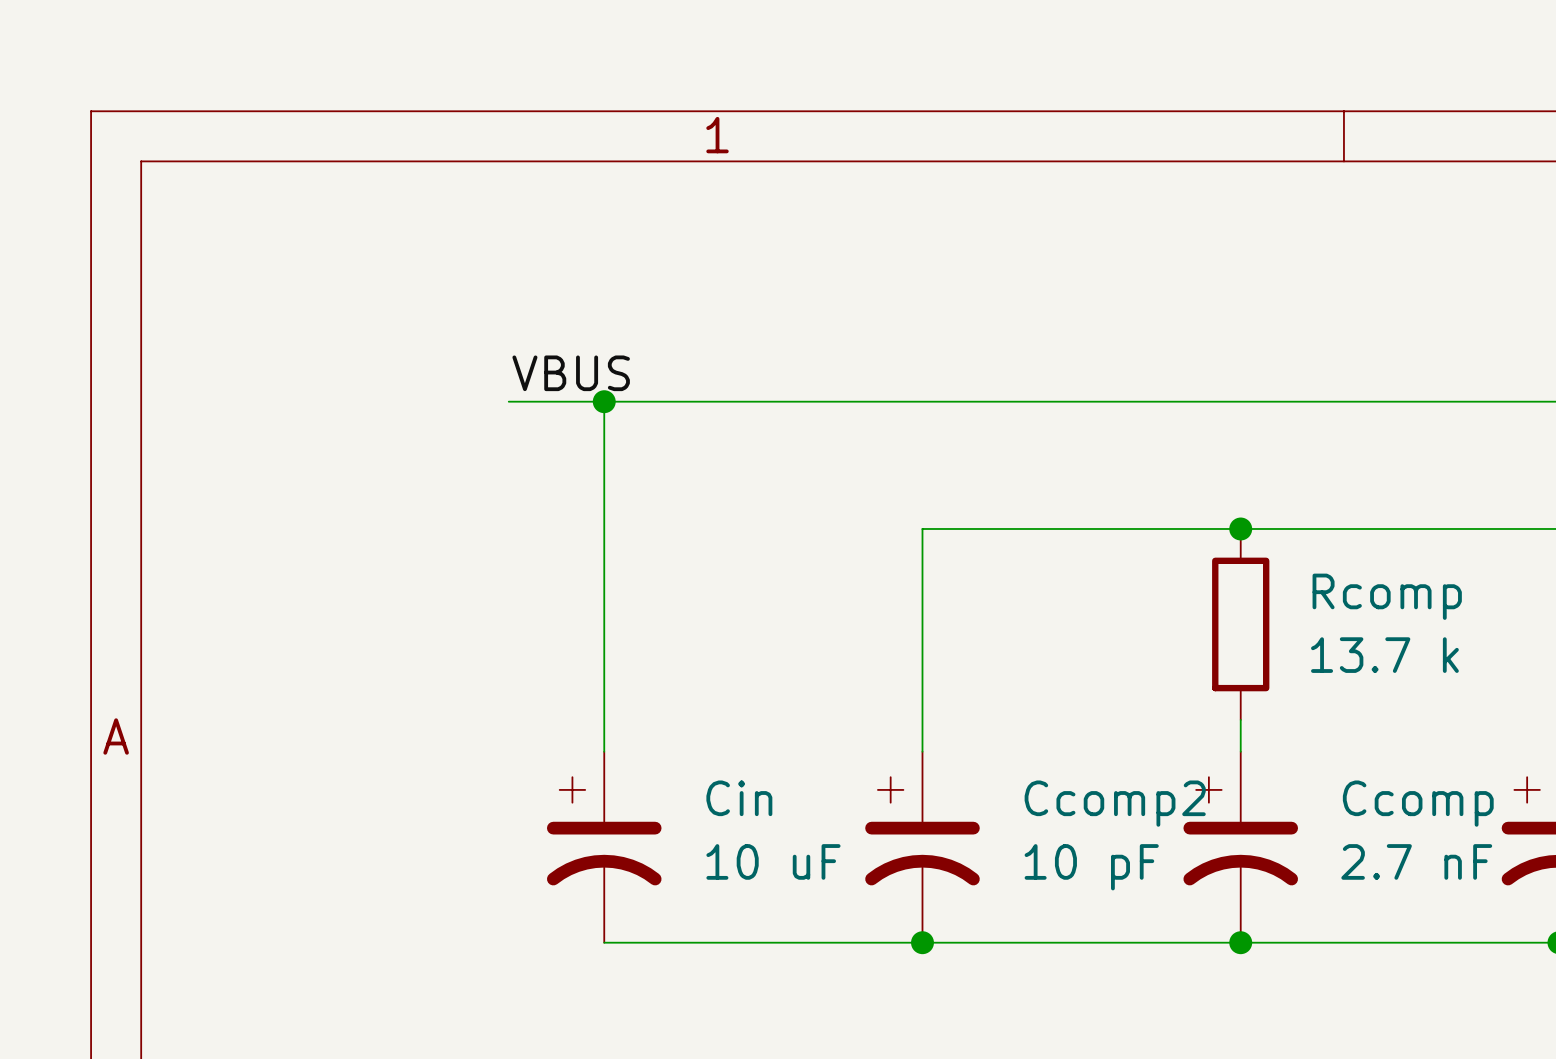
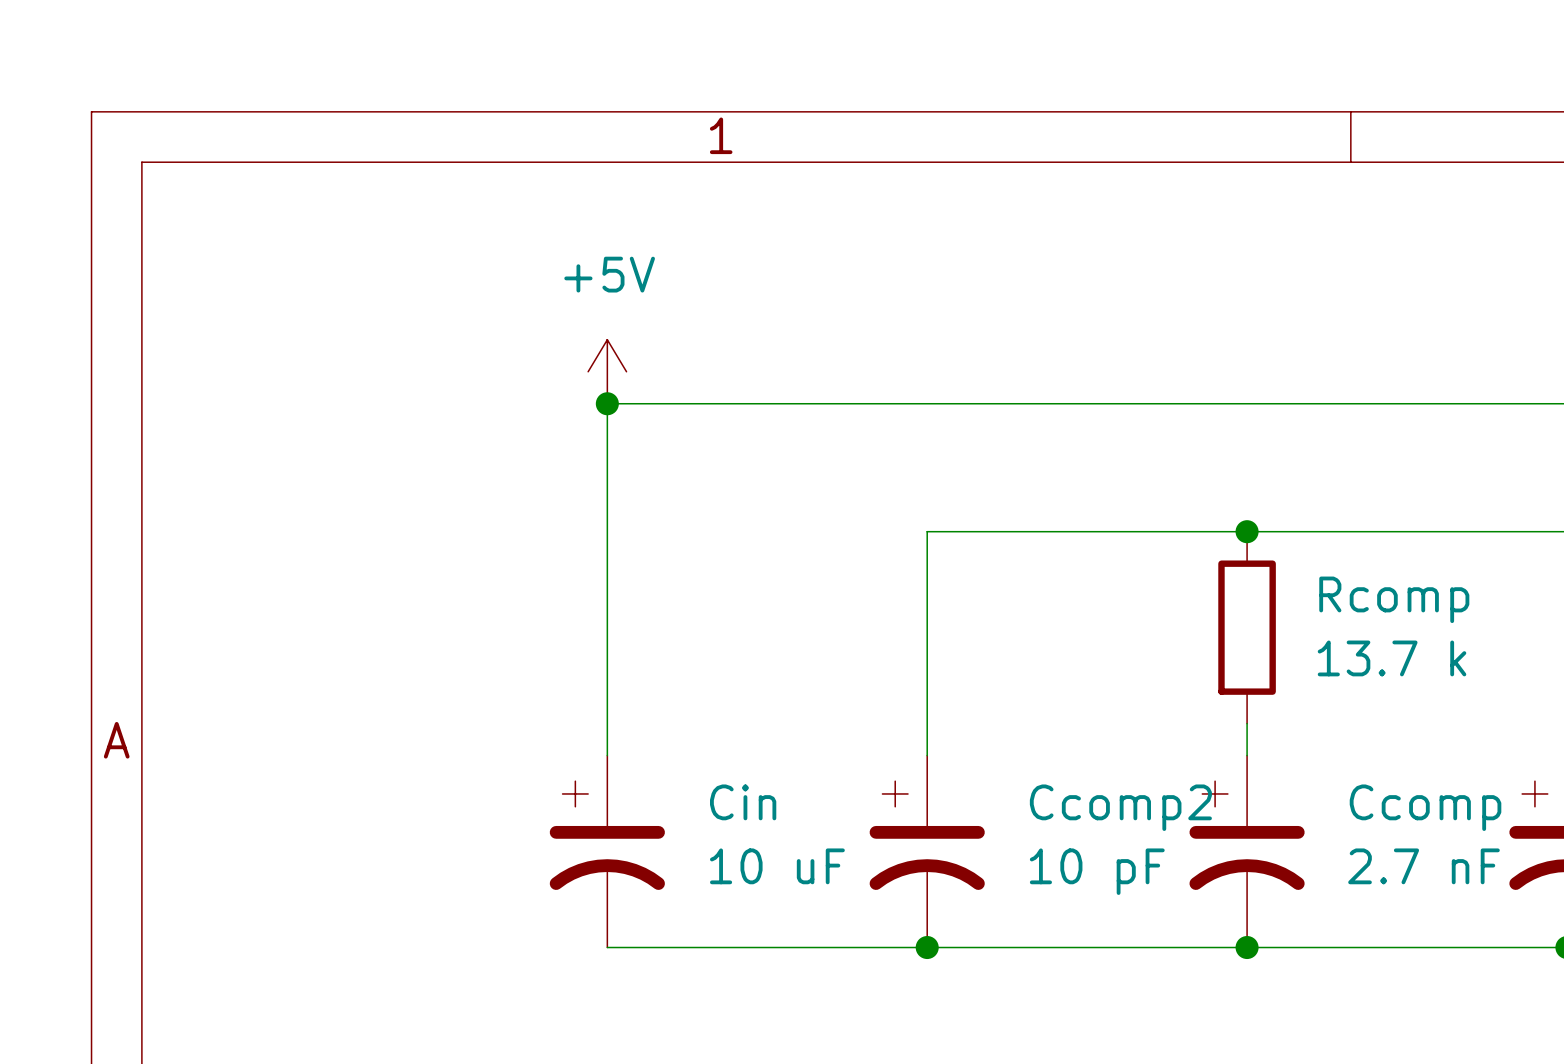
power symbol: none -> +5V (607, 371)
label: VBUS (571, 373) -> none
wire: (508, 401) (604, 401) -> none

